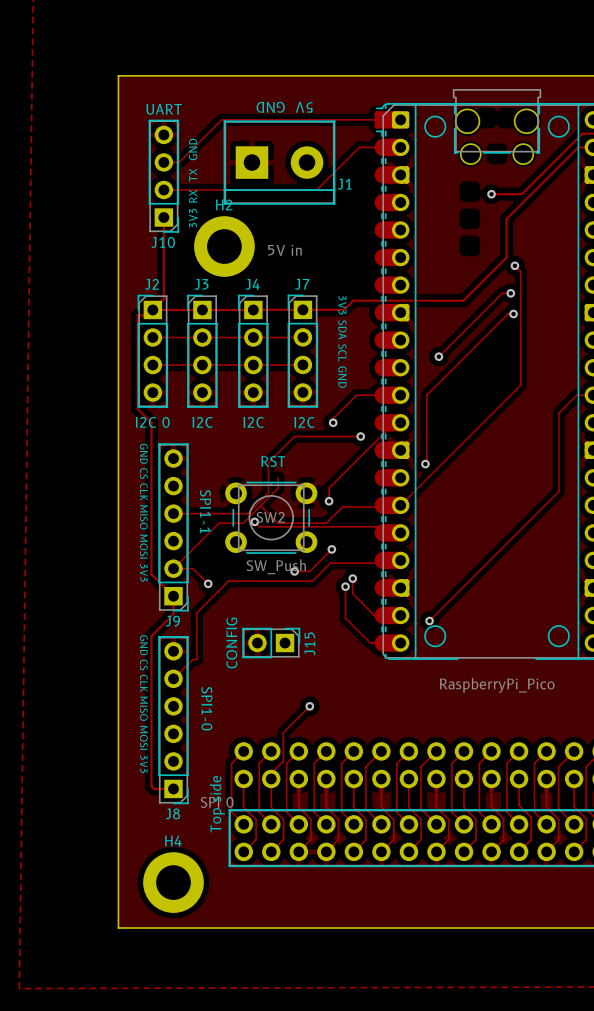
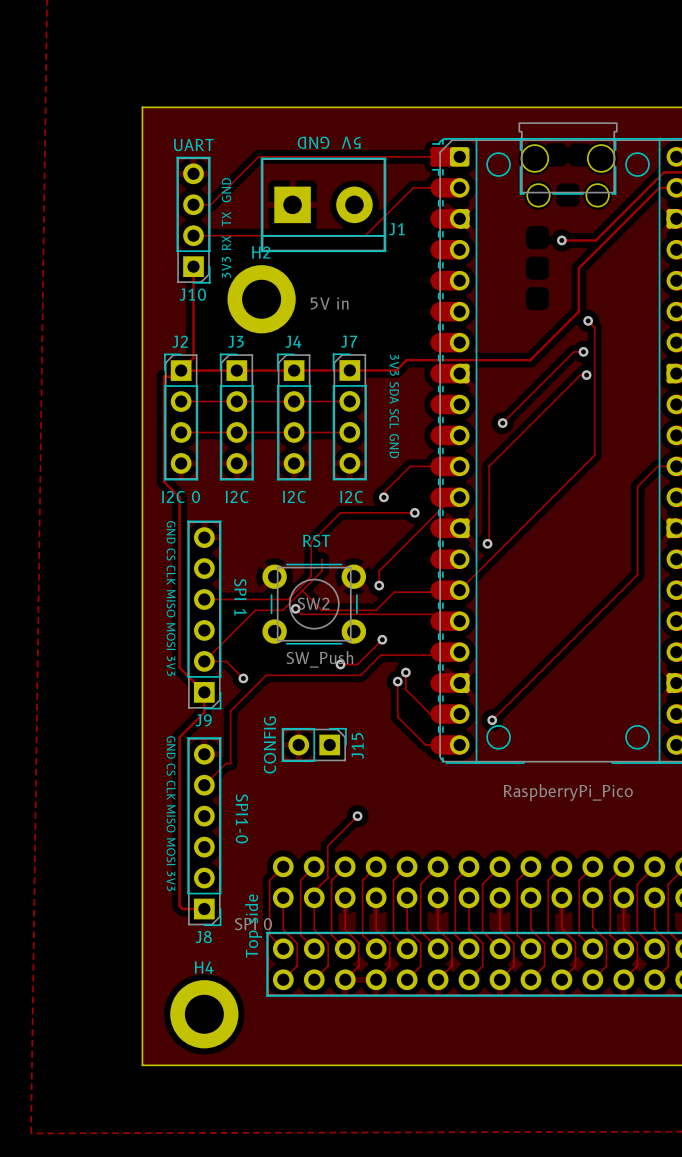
J9 value: SPI1-1 (205, 511) -> SPI 1 (240, 597)

